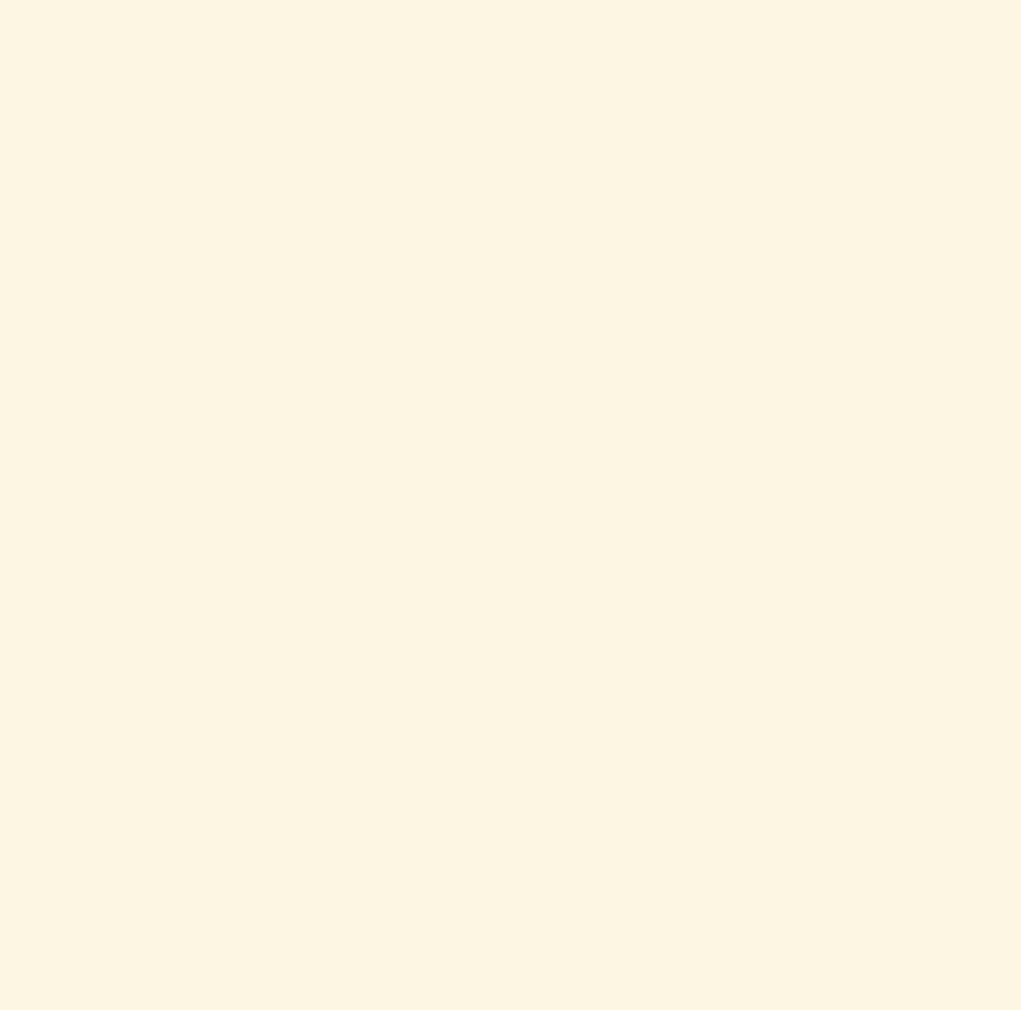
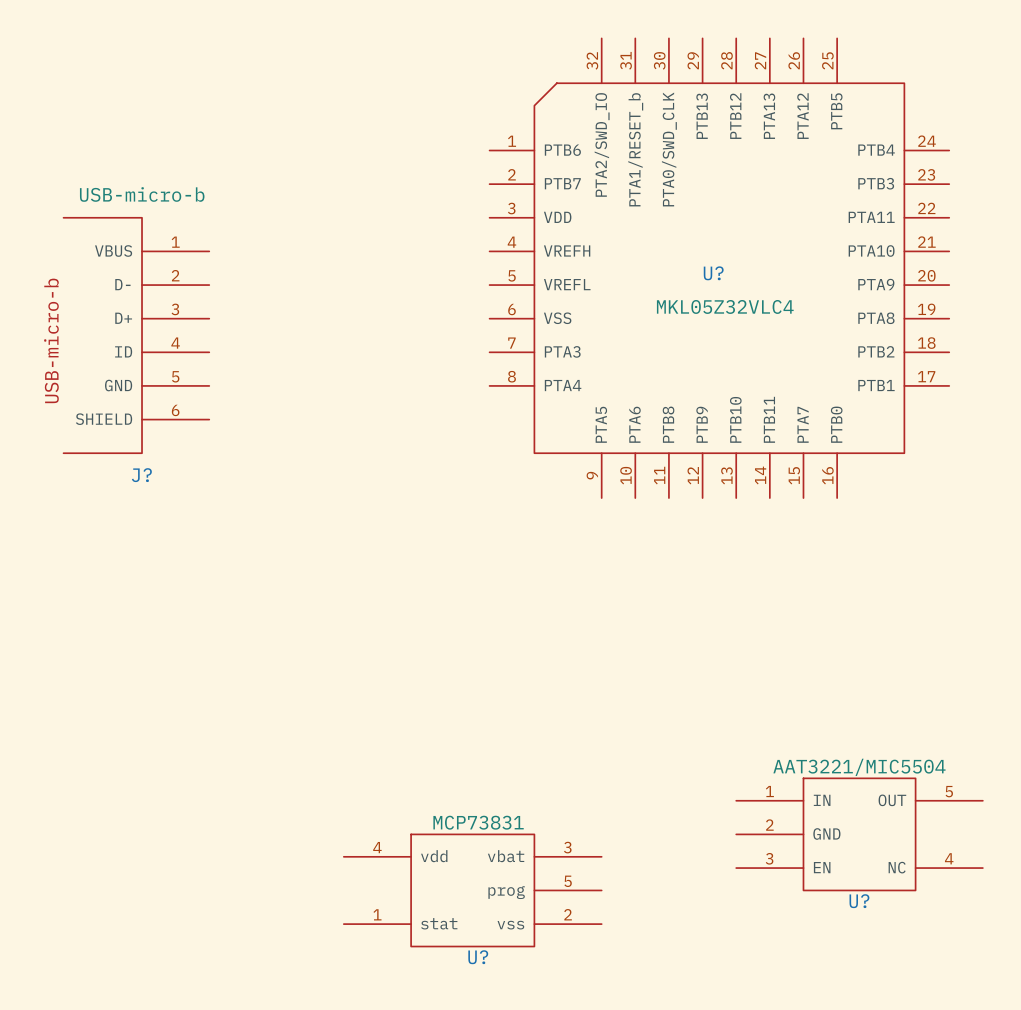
U?: none -> MKL05Z32VLC4 (719, 268)
J?: none -> USB-micro-b (136, 335)
U?: none -> AAT3221/MIC5504 (859, 834)
U?: none -> MCP73831 (472, 890)

